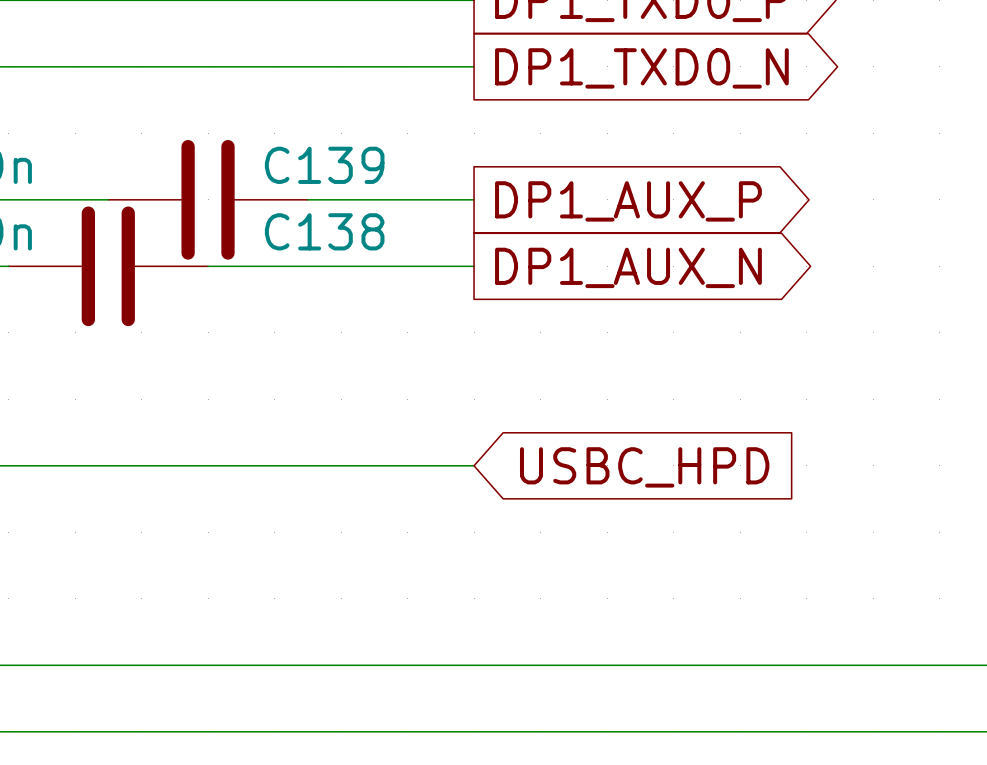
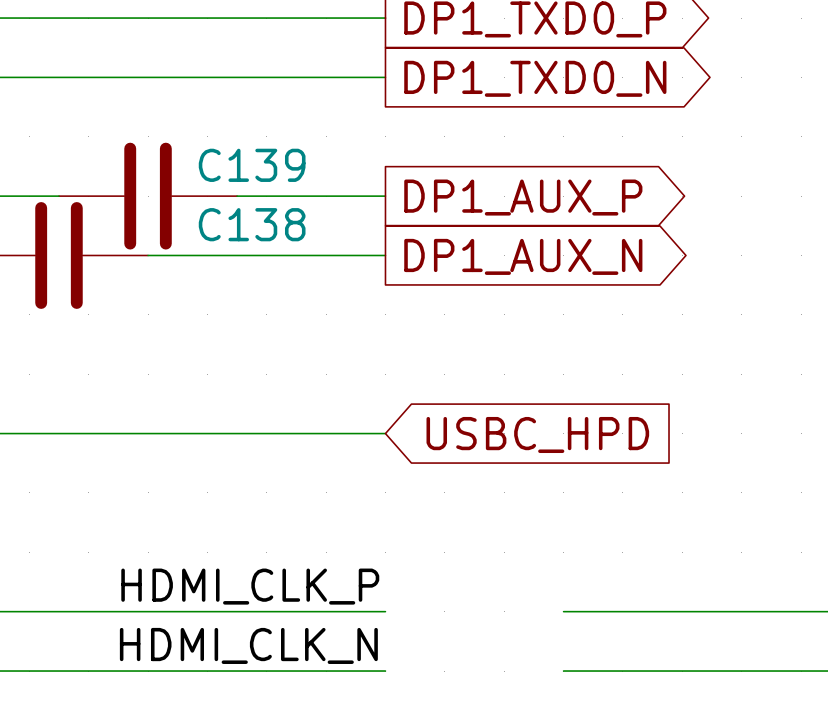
label: none -> HDMI_CLK_P (250, 586)
wire: (474, 665) (673, 665) -> none
label: none -> HDMI_CLK_N (248, 645)
wire: (474, 731) (673, 731) -> none

